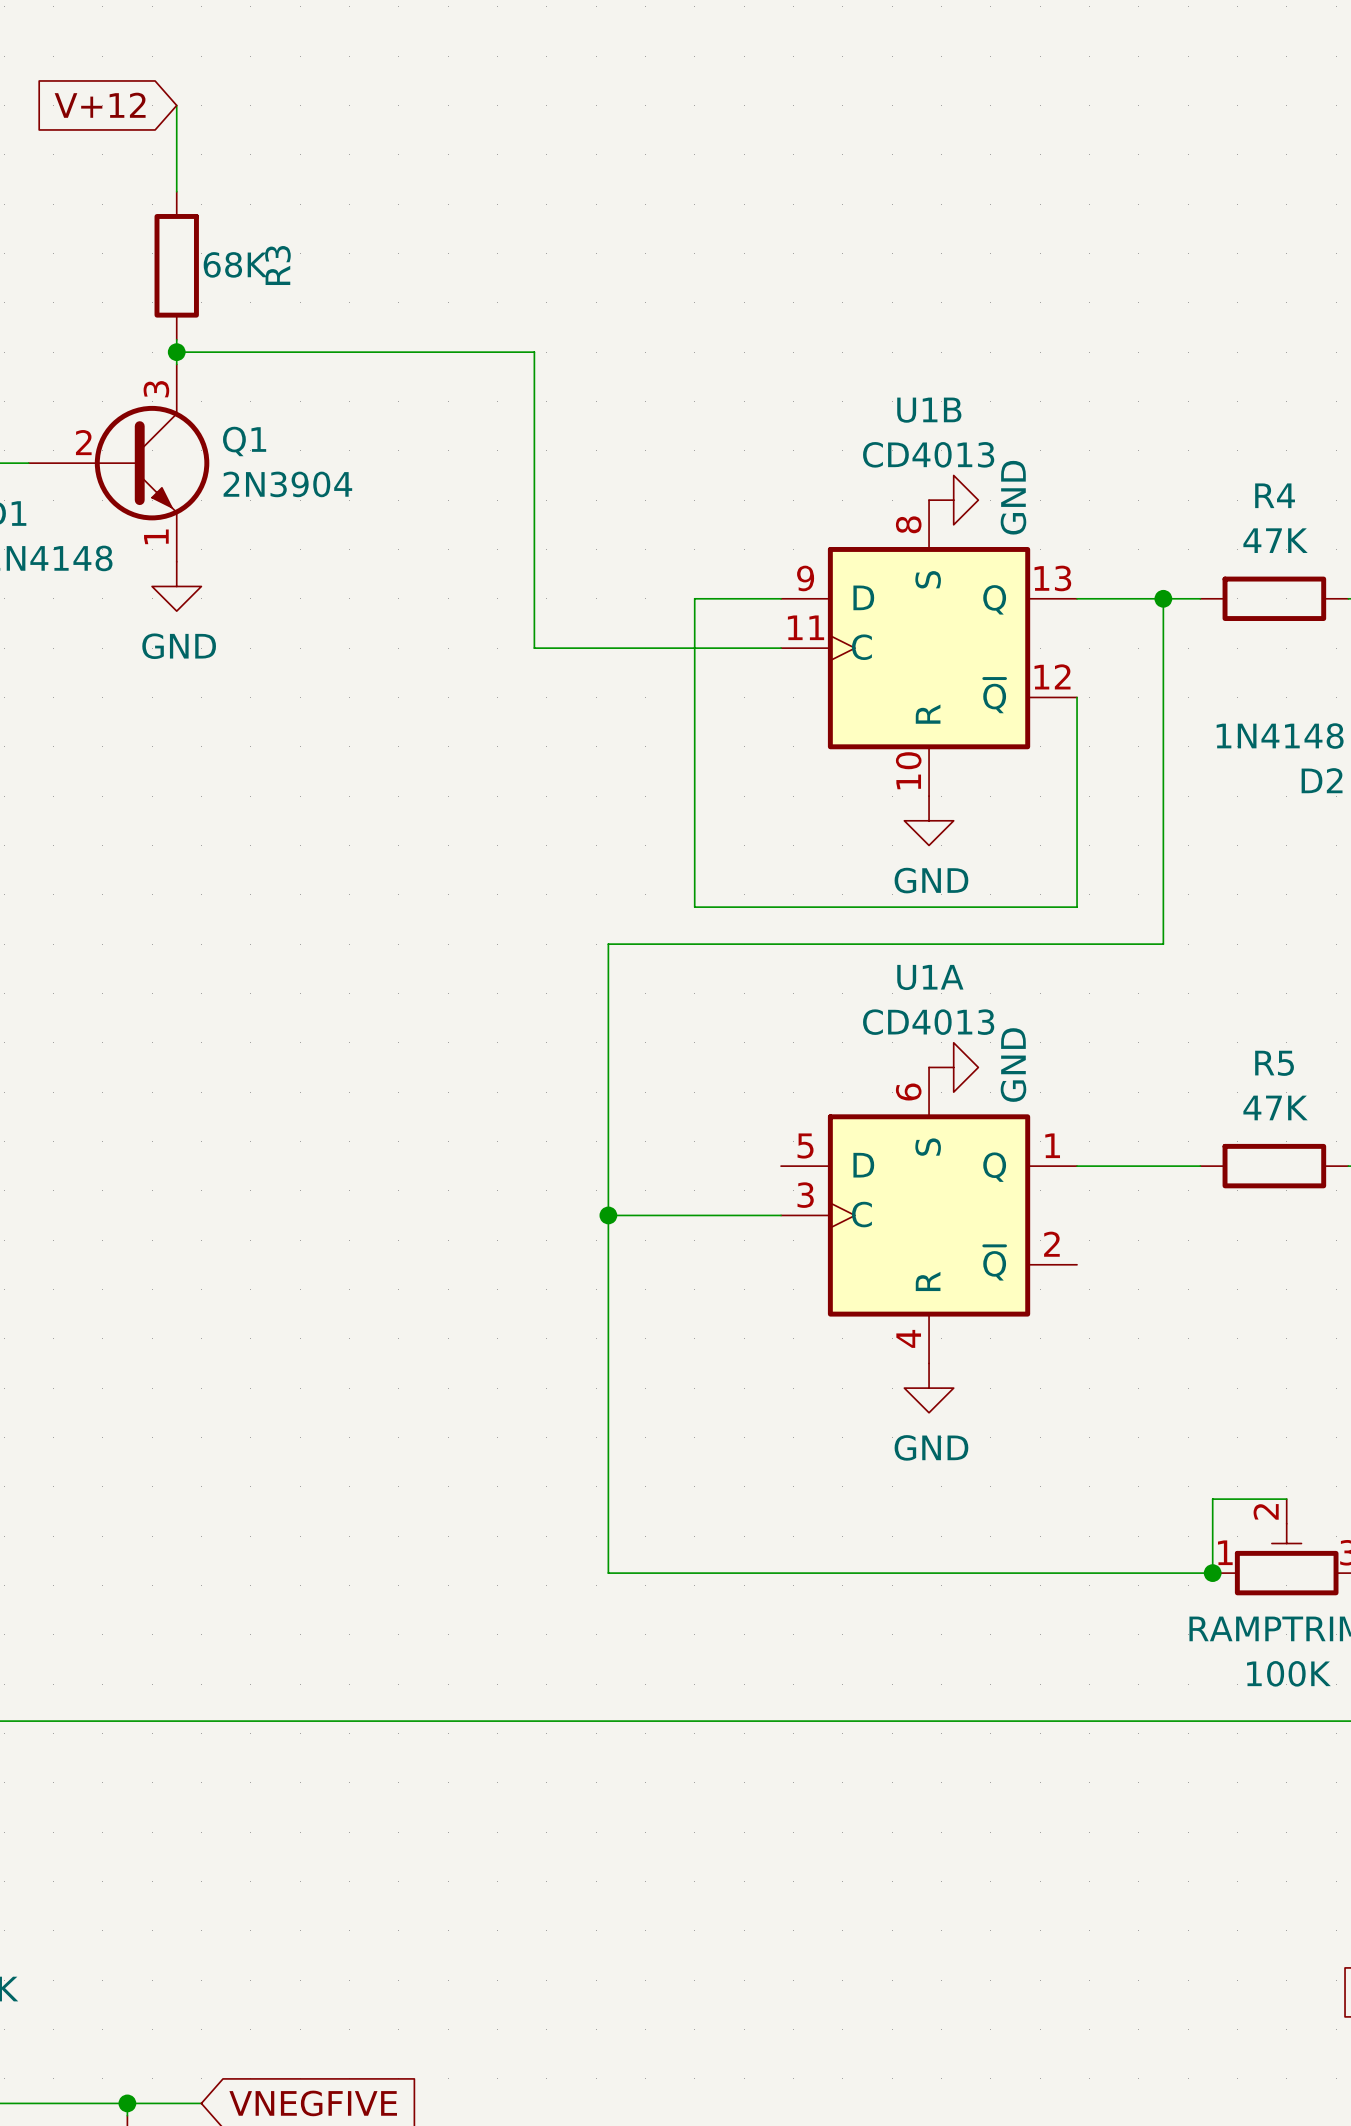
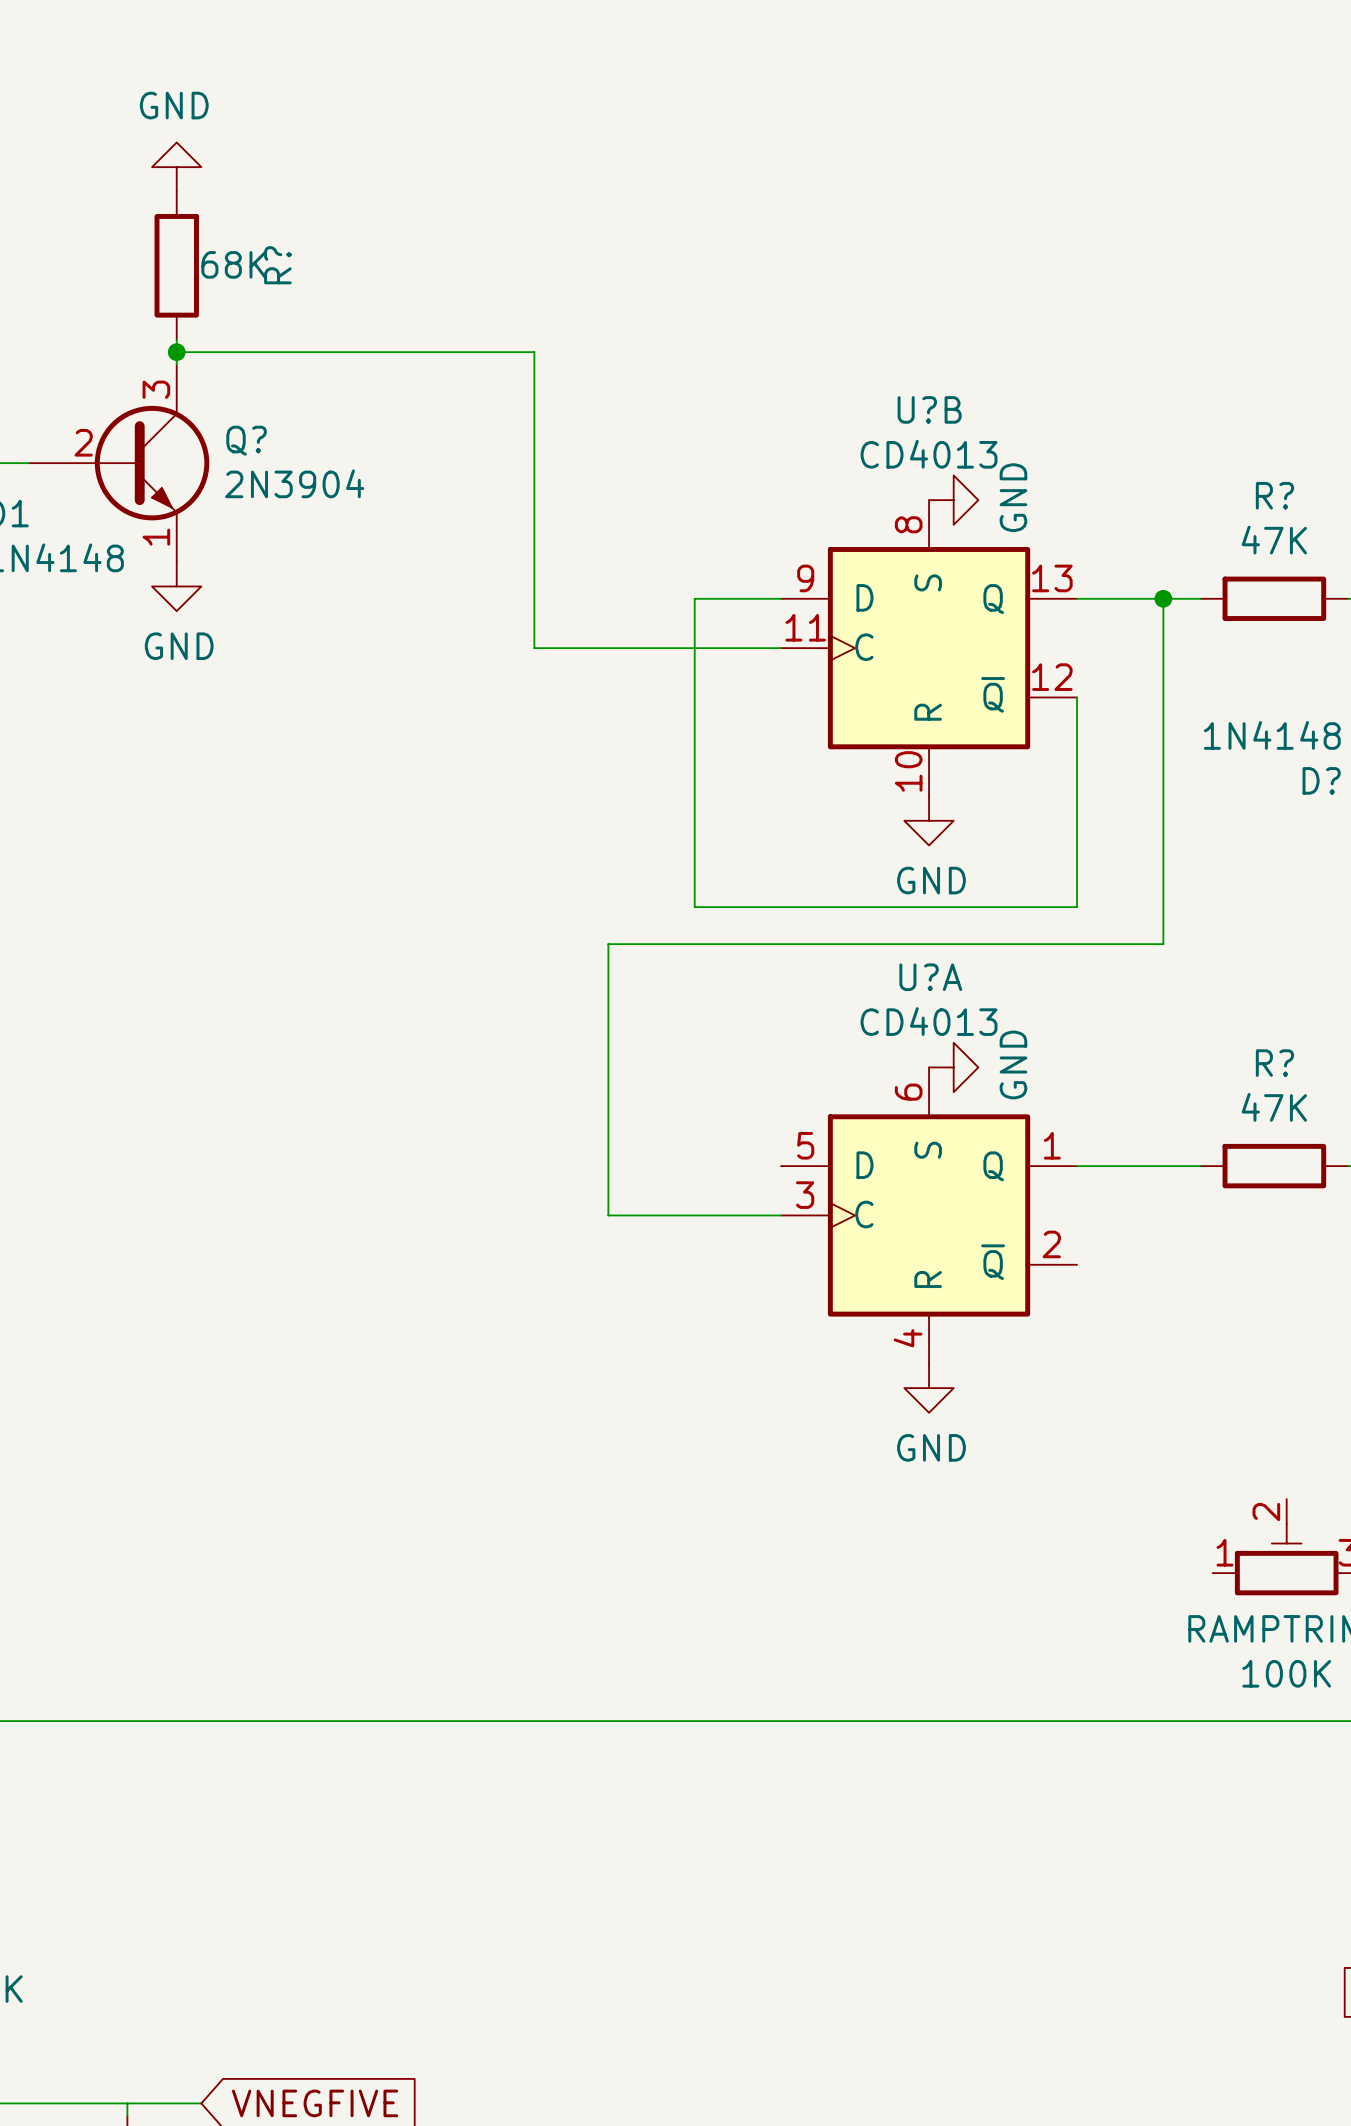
global label: V+12 (100, 105) -> none
wire: (176, 105) (176, 191) -> none
power symbol: none -> GND (176, 167)
R3 name: R3 (277, 265) -> R? (277, 265)
U1B name: U1B (929, 410) -> U?B (929, 409)
Q1 name: Q1 (244, 441) -> Q? (246, 440)
R4 name: R4 (1275, 495) -> R? (1274, 495)
D2 name: D2 (1322, 780) -> D? (1321, 780)
U1A name: U1A (930, 977) -> U?A (930, 977)
R5 name: R5 (1274, 1063) -> R? (1274, 1063)
wire: (608, 1215) (608, 1573) (1212, 1573) (1212, 1499) (1286, 1499) -> none
junction: (608, 1215) -> none
junction: (1212, 1573) -> none
junction: (127, 2103) -> none

